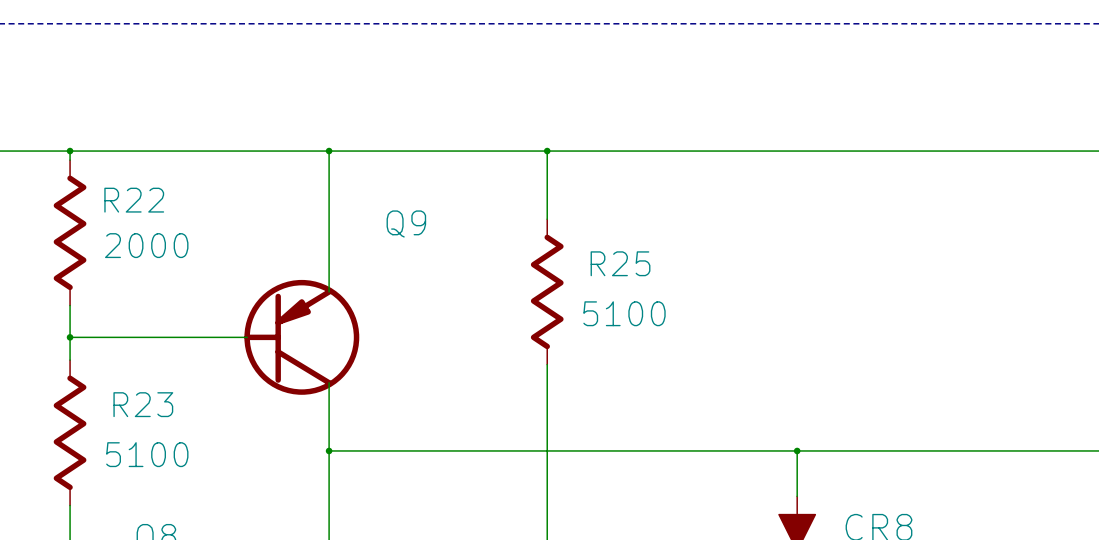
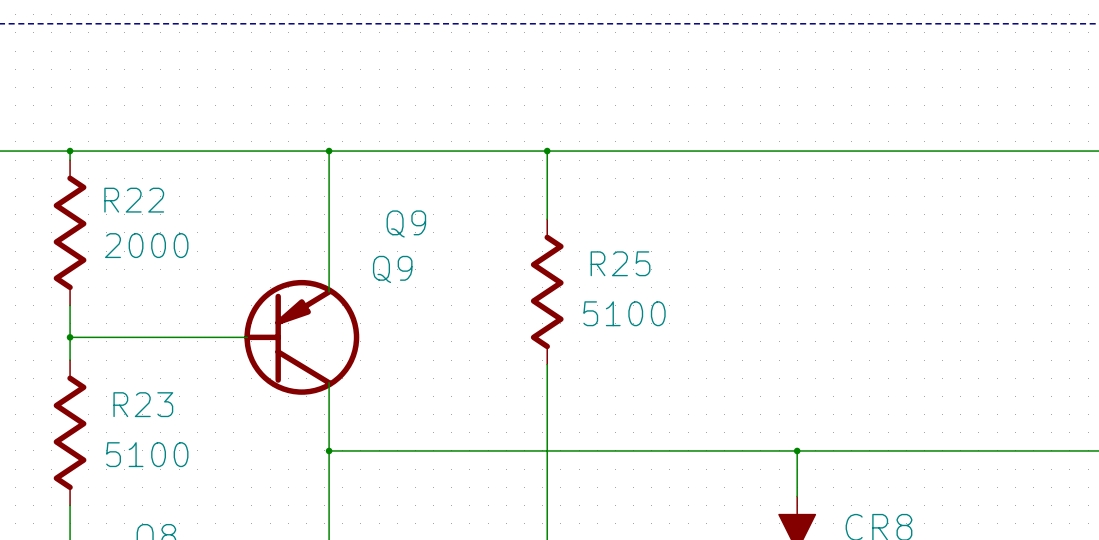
Q9 text: none -> Q9 (392, 269)

